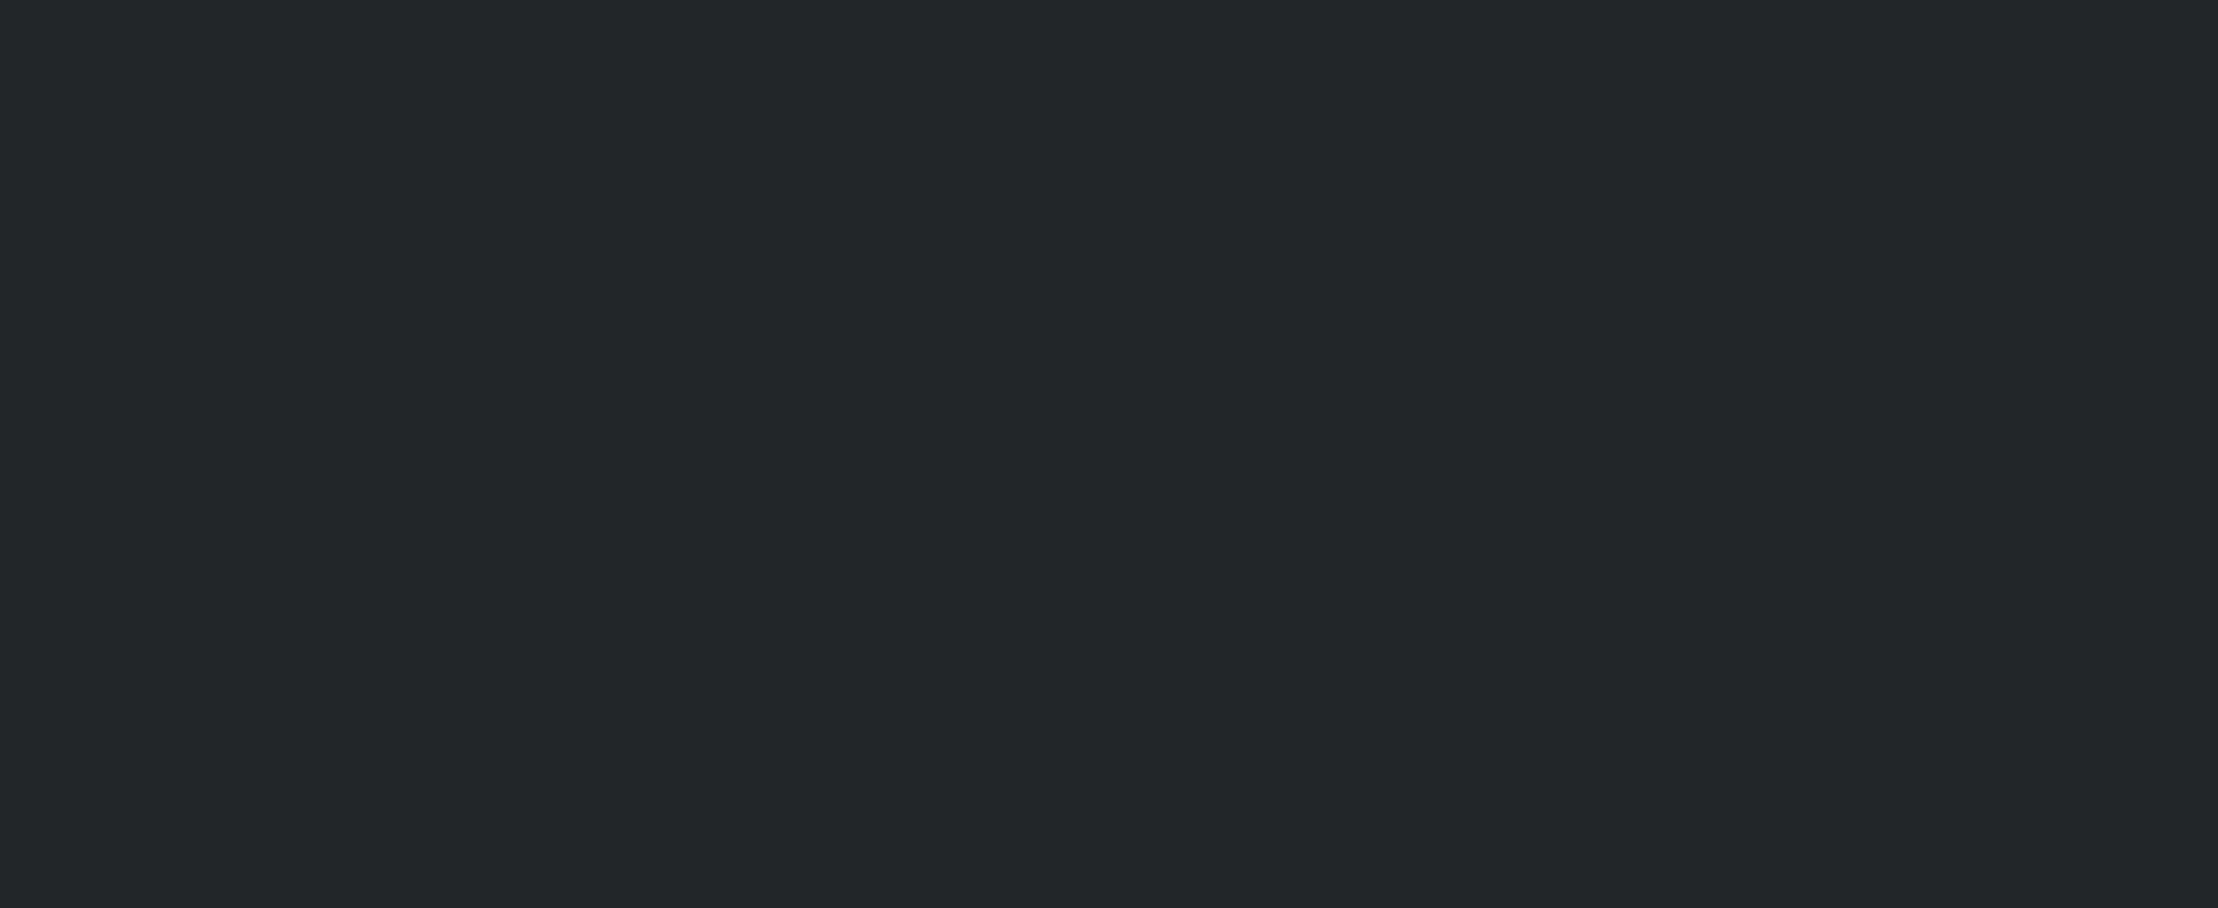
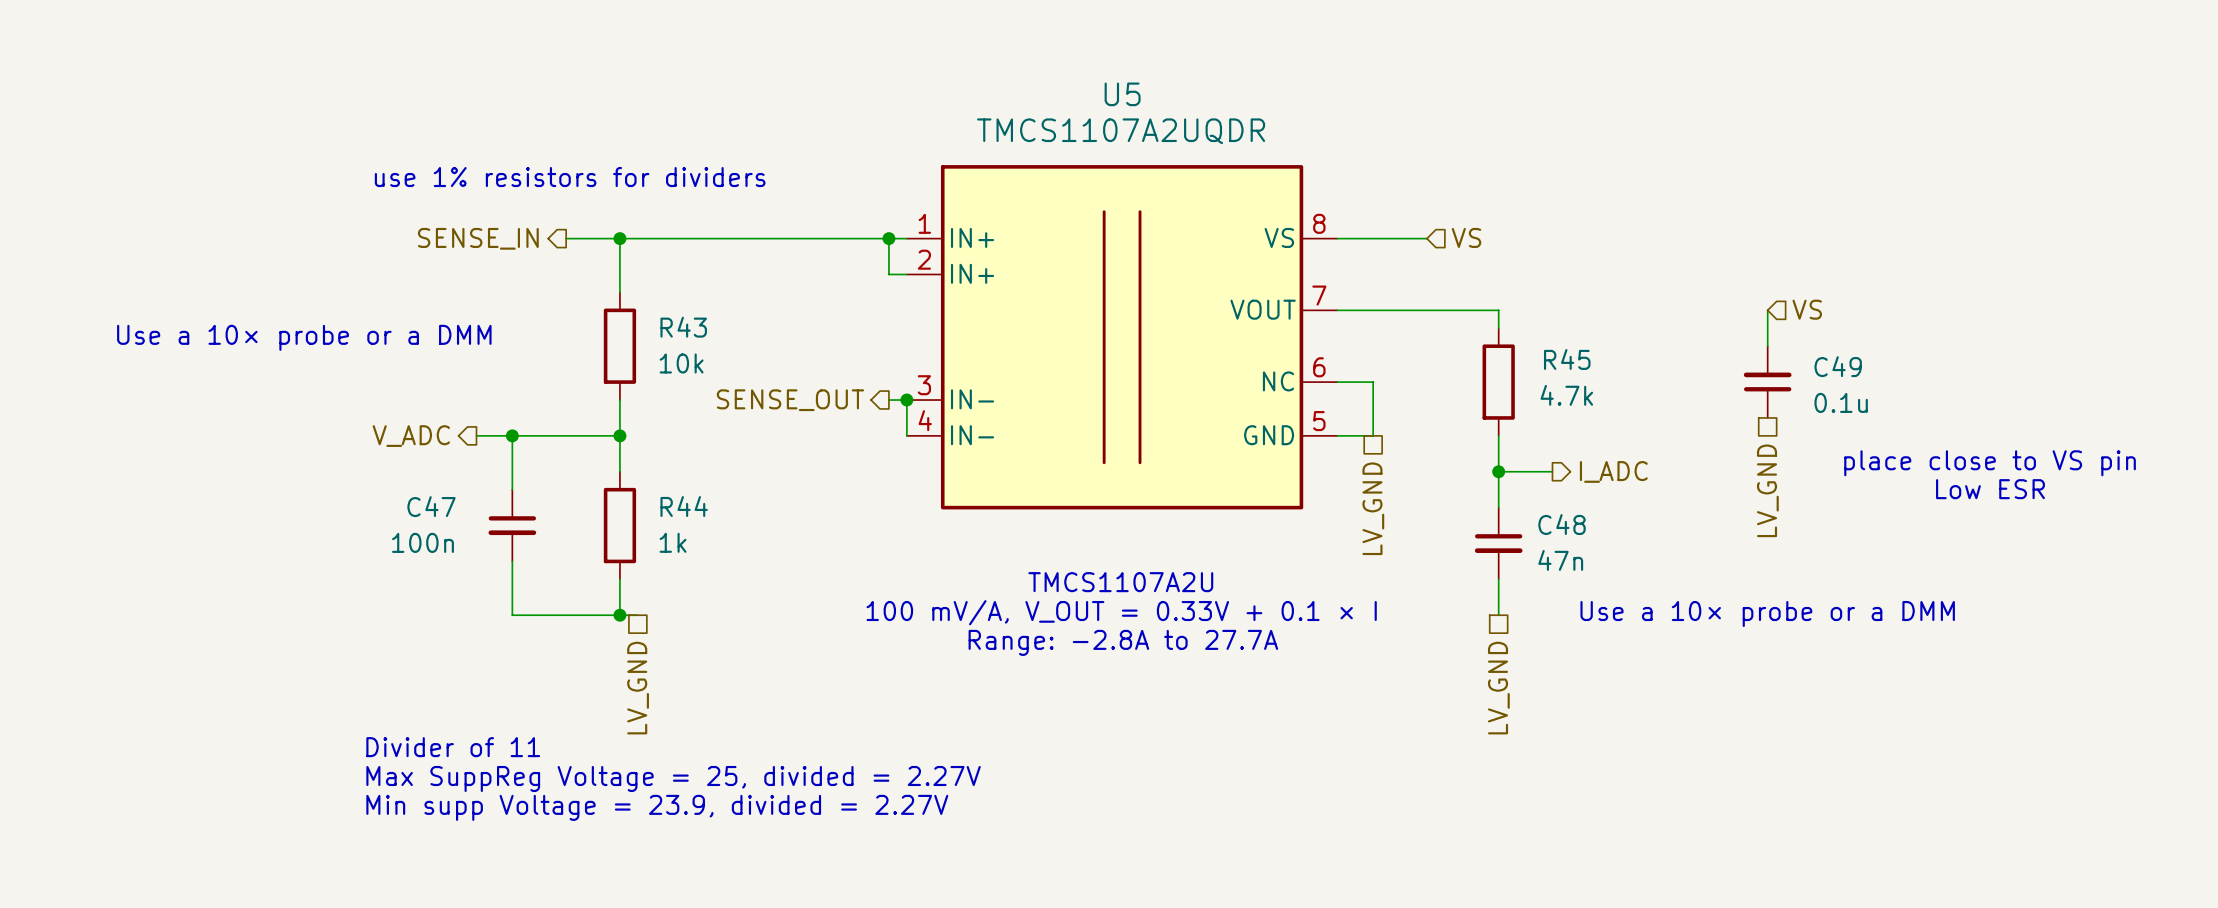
text: none -> use 1% resistors for dividers (570, 177)
hierarchical label: none -> VS (1466, 237)
hierarchical label: none -> SENSE_IN (478, 238)
wire: none -> (566, 238) (906, 238)
wire: none -> (619, 238) (619, 292)
junction: none -> (619, 238)
wire: none -> (888, 238) (888, 274) (906, 274)
junction: none -> (888, 238)
wire: none -> (1337, 238) (1426, 238)
hierarchical label: none -> VS (1807, 309)
wire: none -> (1337, 310) (1498, 310) (1498, 328)
wire: none -> (1767, 310) (1767, 346)
text: none -> Use a 10× probe or a DMM (304, 337)
U5: none -> TMCS1107A2UQDR (1122, 337)
R43: none -> 10k (619, 346)
wire: none -> (1337, 382) (1373, 382) (1373, 435) (1337, 435)
R45: none -> 4.7k (1498, 382)
C49: none -> 0.1u (1767, 382)
wire: none -> (619, 400) (619, 471)
hierarchical label: none -> SENSE_OUT (790, 400)
wire: none -> (888, 400) (906, 400) (906, 435)
junction: none -> (906, 400)
wire: none -> (476, 435) (619, 435)
wire: none -> (512, 435) (512, 489)
junction: none -> (512, 435)
junction: none -> (619, 435)
wire: none -> (1498, 435) (1498, 507)
hierarchical label: none -> V_ADC (411, 436)
text: none -> place close to VS pin (1990, 463)
wire: none -> (1498, 471) (1552, 471)
junction: none -> (1498, 471)
hierarchical label: none -> I_ADC (1613, 471)
text: none -> Low ESR (1990, 489)
hierarchical label: none -> LV_GND (1767, 490)
hierarchical label: none -> LV_GND (1373, 508)
C47: none -> 100n (512, 525)
R44: none -> 1k (619, 525)
C48: none -> 47n (1498, 543)
wire: none -> (512, 561) (512, 615) (637, 615)
wire: none -> (619, 579) (619, 615)
wire: none -> (1498, 579) (1498, 615)
text: none -> TMCS1107A2U (1120, 582)
text: none -> 100 mV/A, V_OUT = 0.33V + 0.1 × I (1121, 612)
text: none -> Use a 10× probe or a DMM (1767, 614)
junction: none -> (619, 615)
text: none -> Range: −2.8A to 27.7A (1123, 642)
hierarchical label: none -> LV_GND (638, 688)
hierarchical label: none -> LV_GND (1498, 688)
text: none -> Divider of 11 (453, 747)
text: none -> Max SuppReg Voltage = 25, divided = 2.27V (673, 778)
text: none -> Min supp Voltage = 23.9, divided = 2.27V (657, 807)

